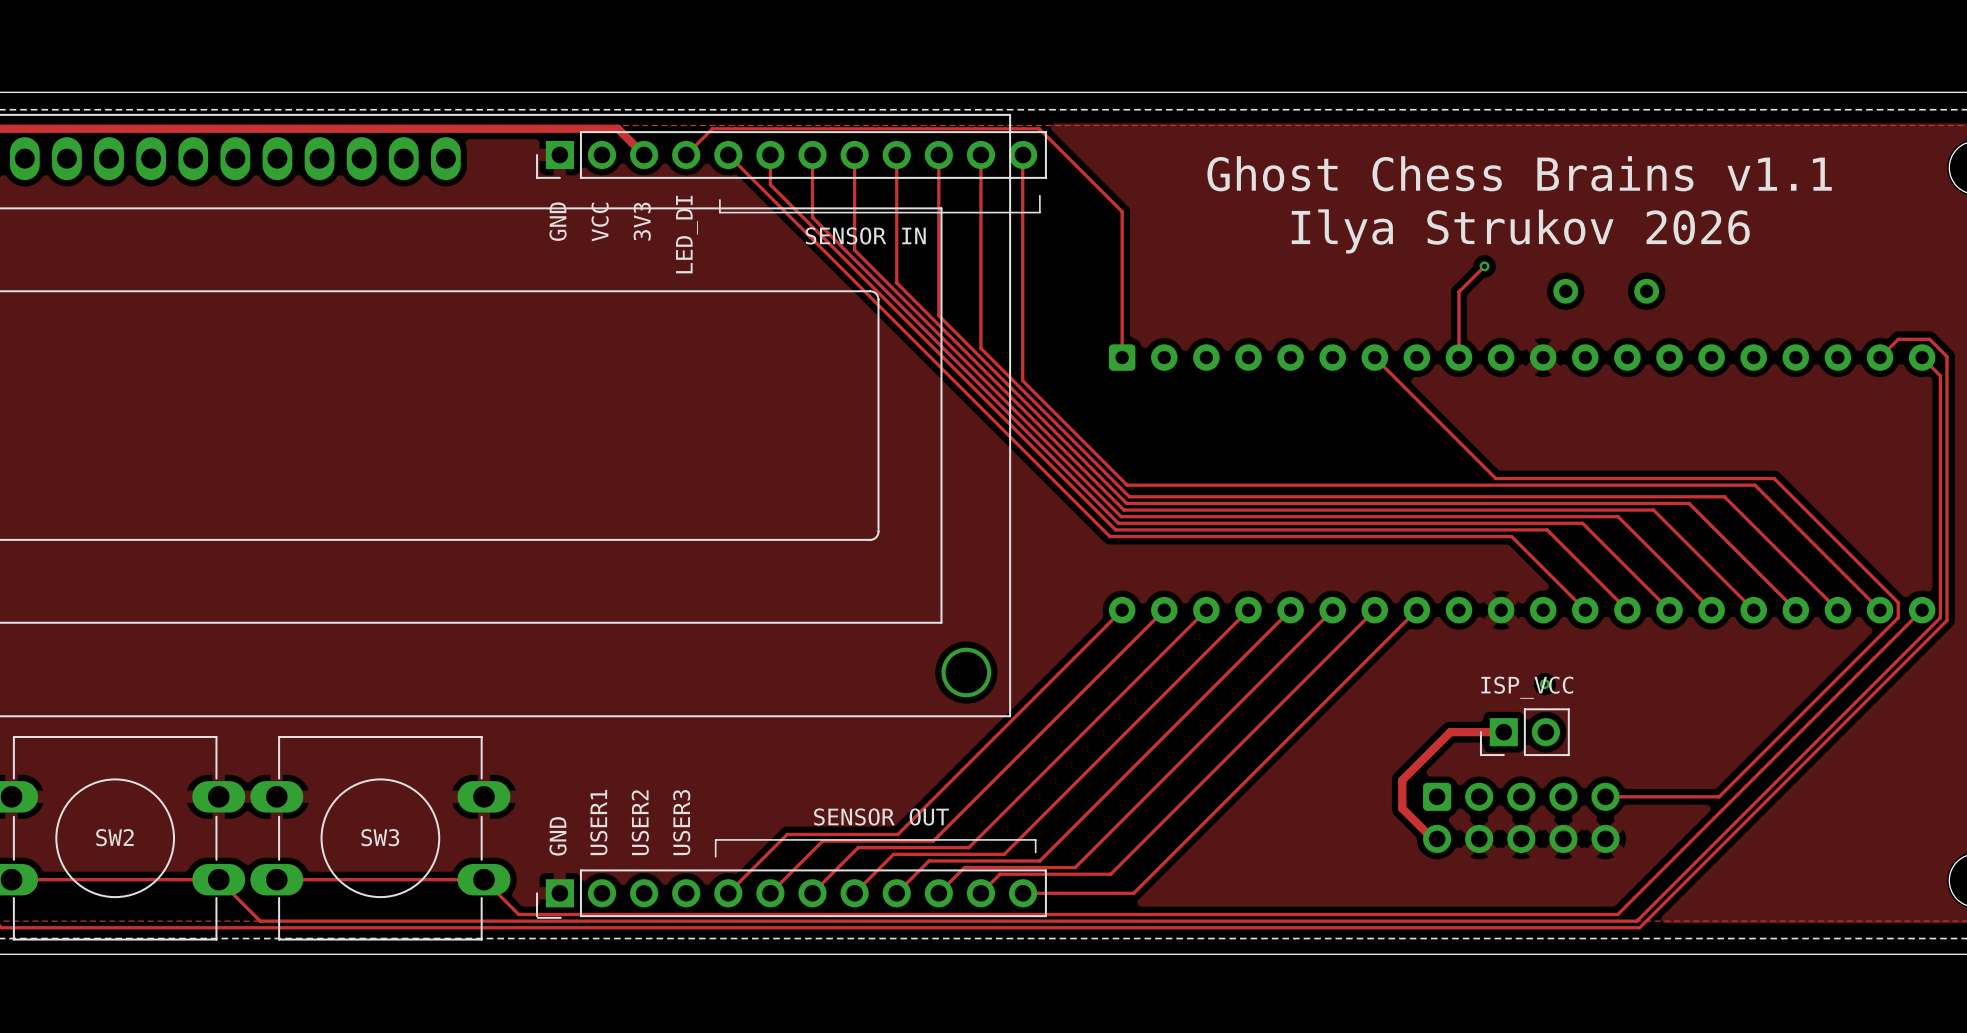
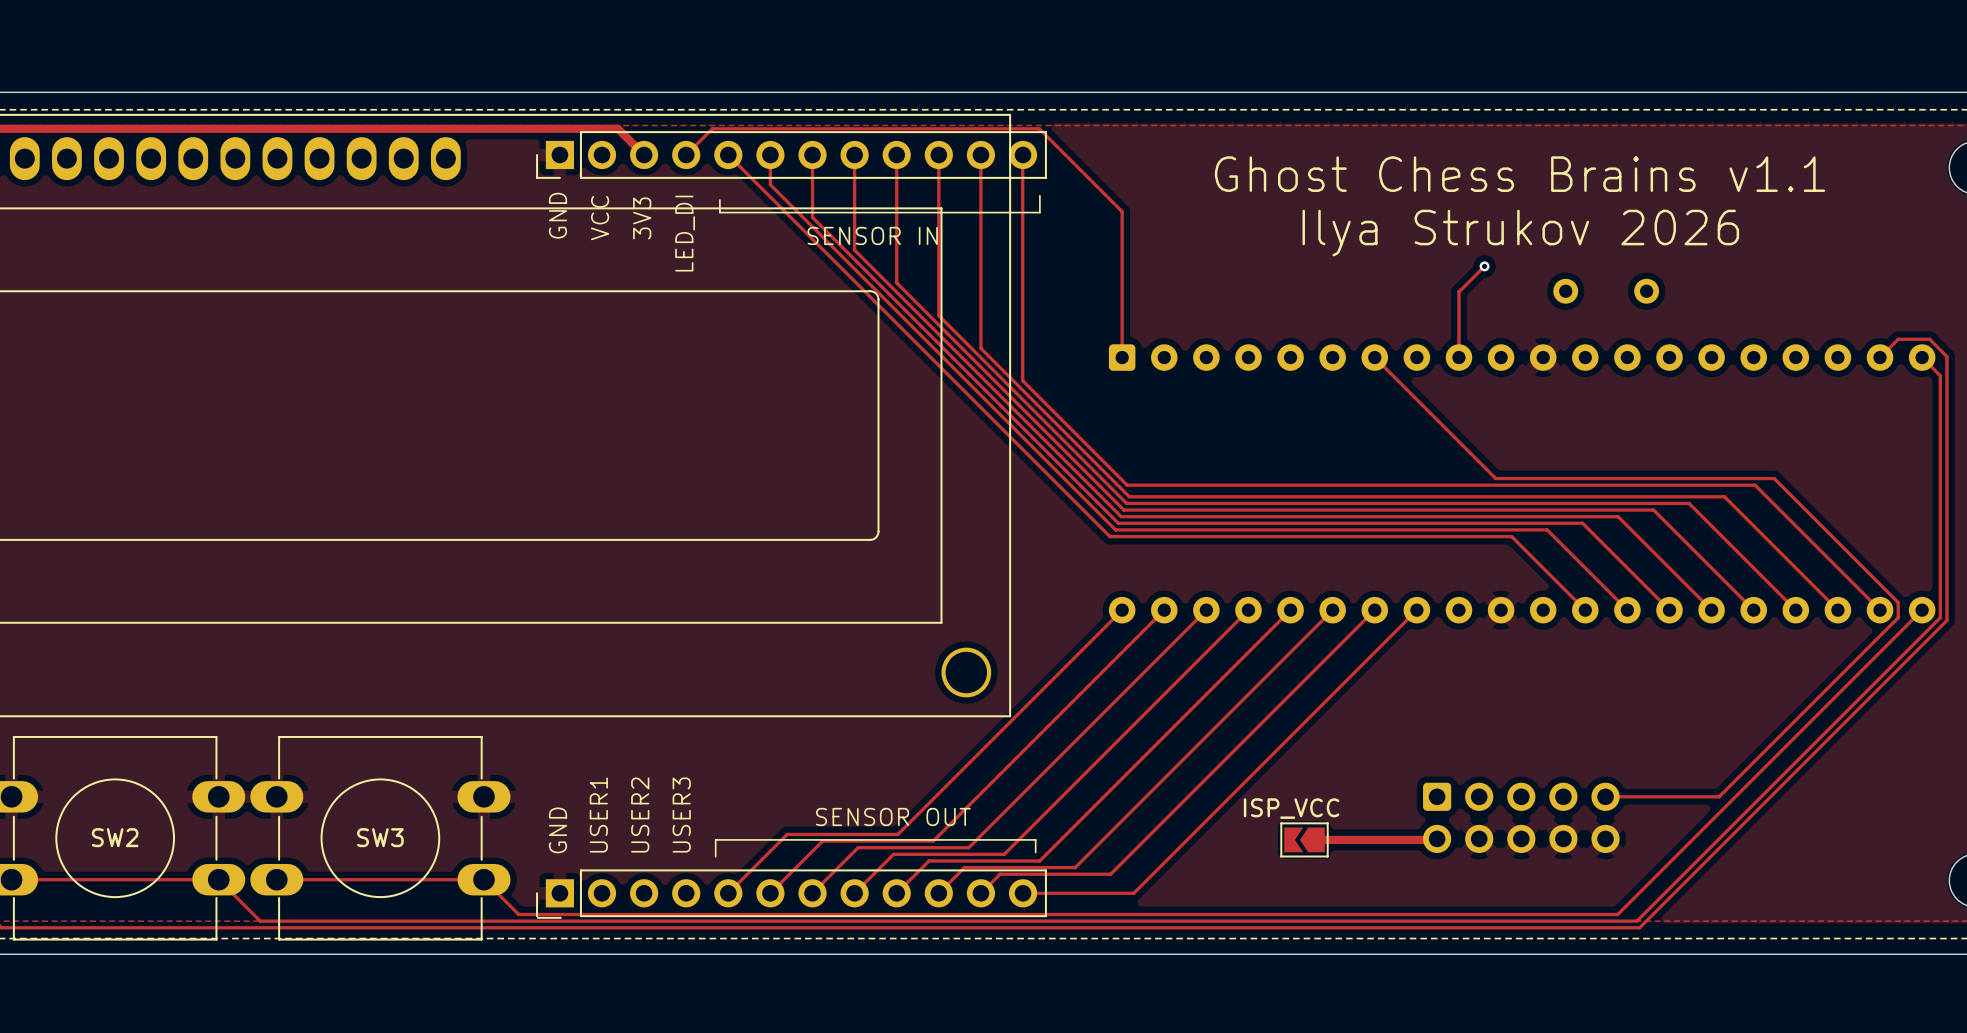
via: (1544, 684) -> none
track: (1503, 732) (1450, 732) (1402, 780) (1402, 808) (1432, 838) (1437, 838) -> (1316, 839) (1437, 838)
part: ISP_VCC (1524, 732) -> none
part: none -> ISP_VCC (1304, 839)

